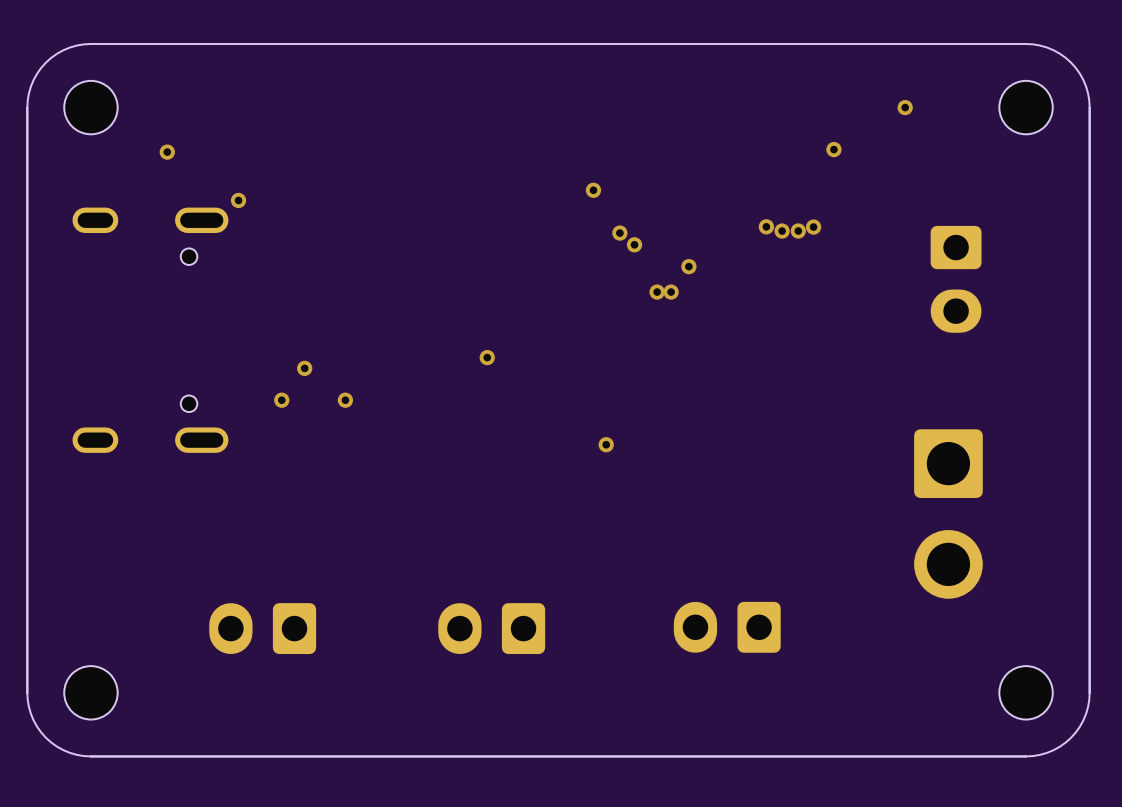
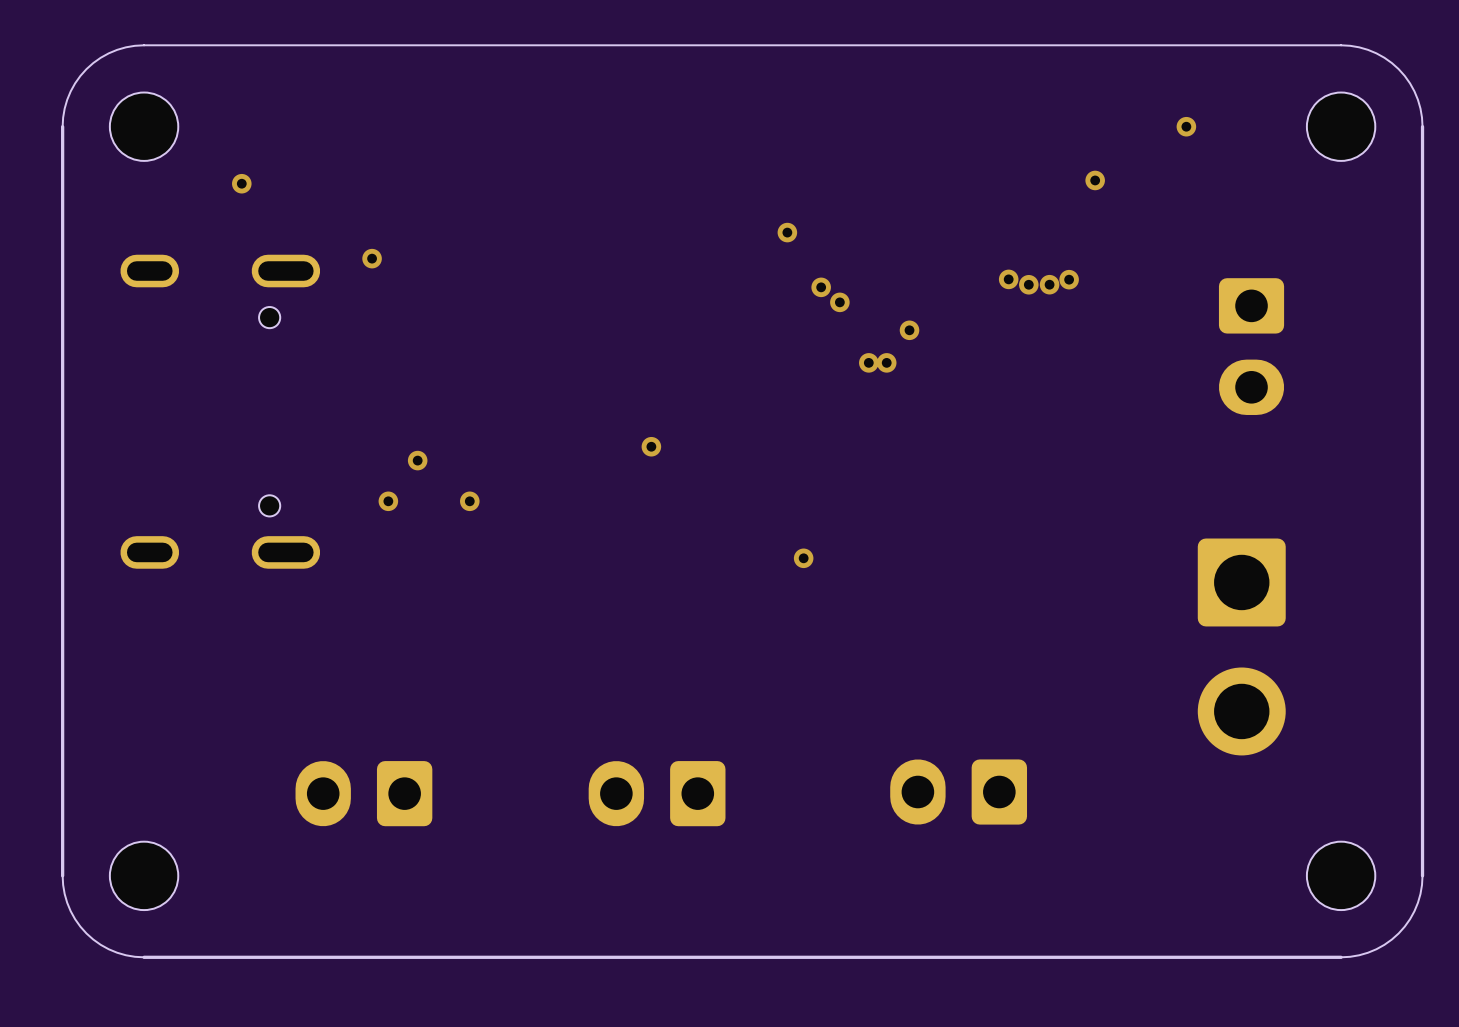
via position: (238, 200) -> (372, 258)

